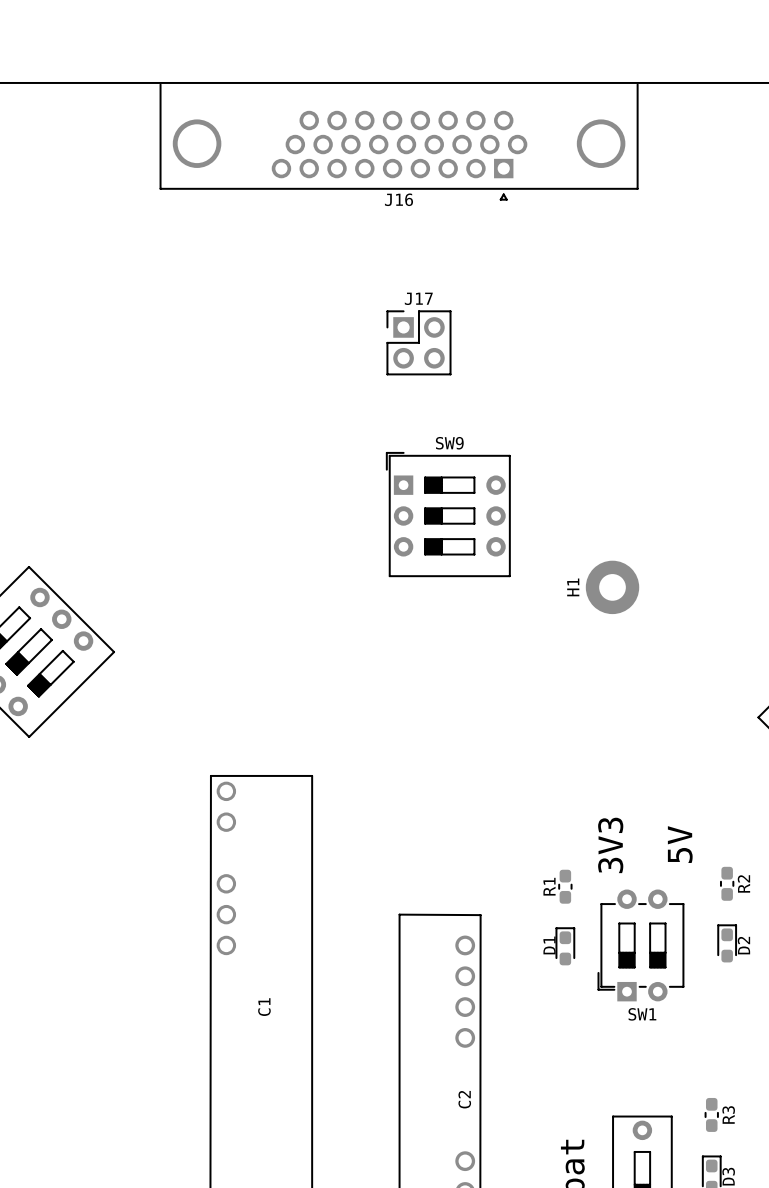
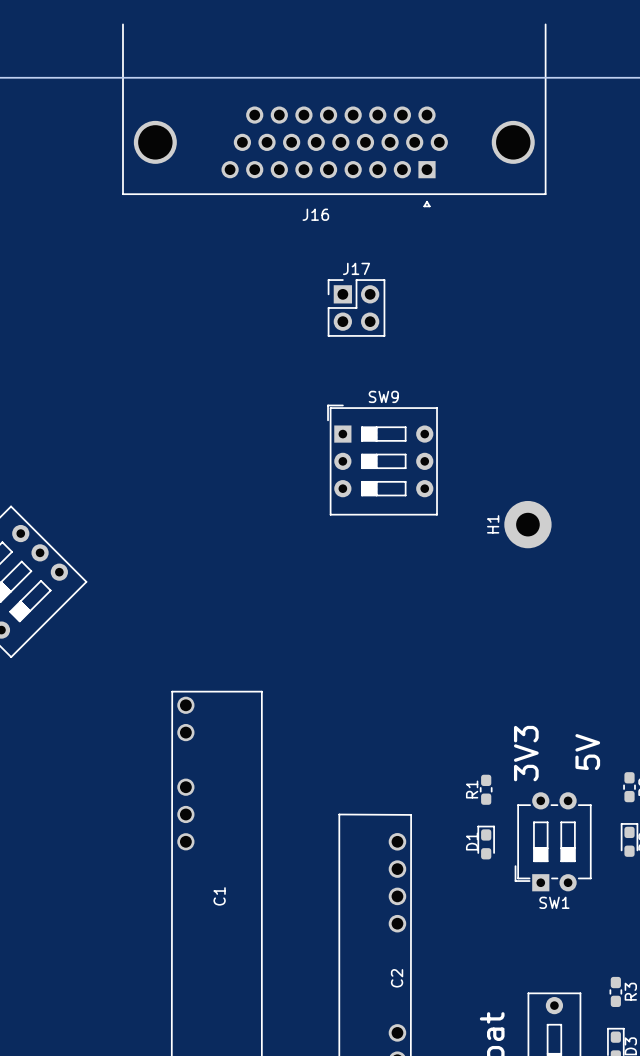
J16 footprint: [159, 83, 639, 201] -> [122, 23, 547, 208]
J16 name position: J16 (398, 199) -> J16 (315, 214)

